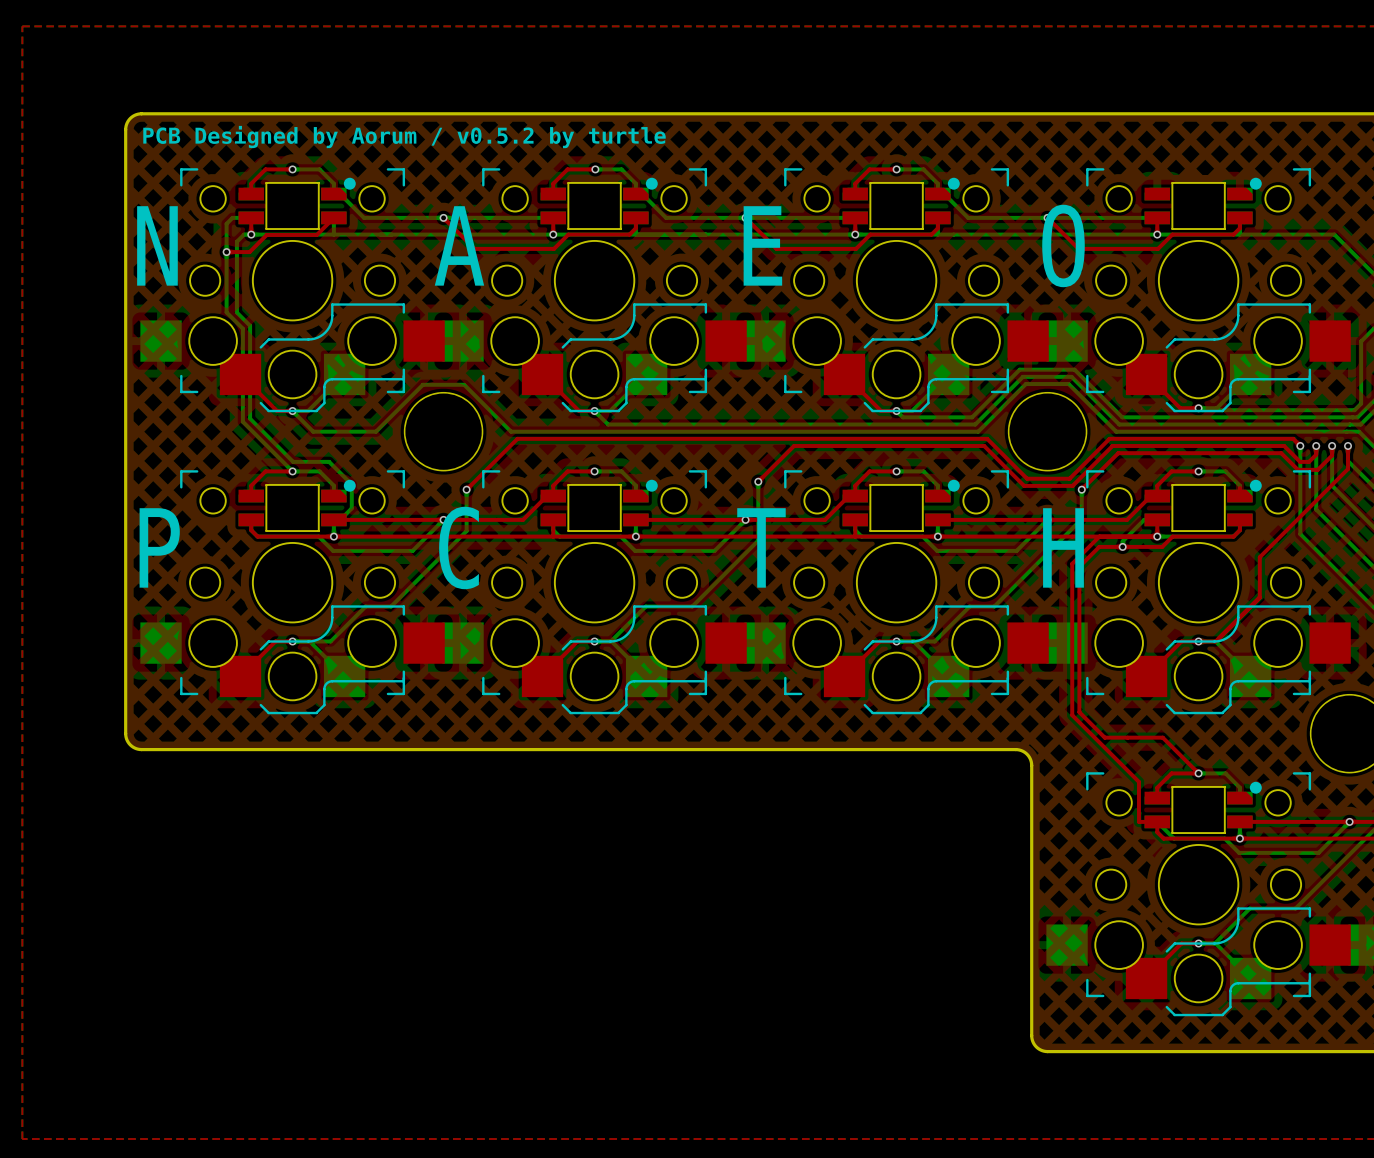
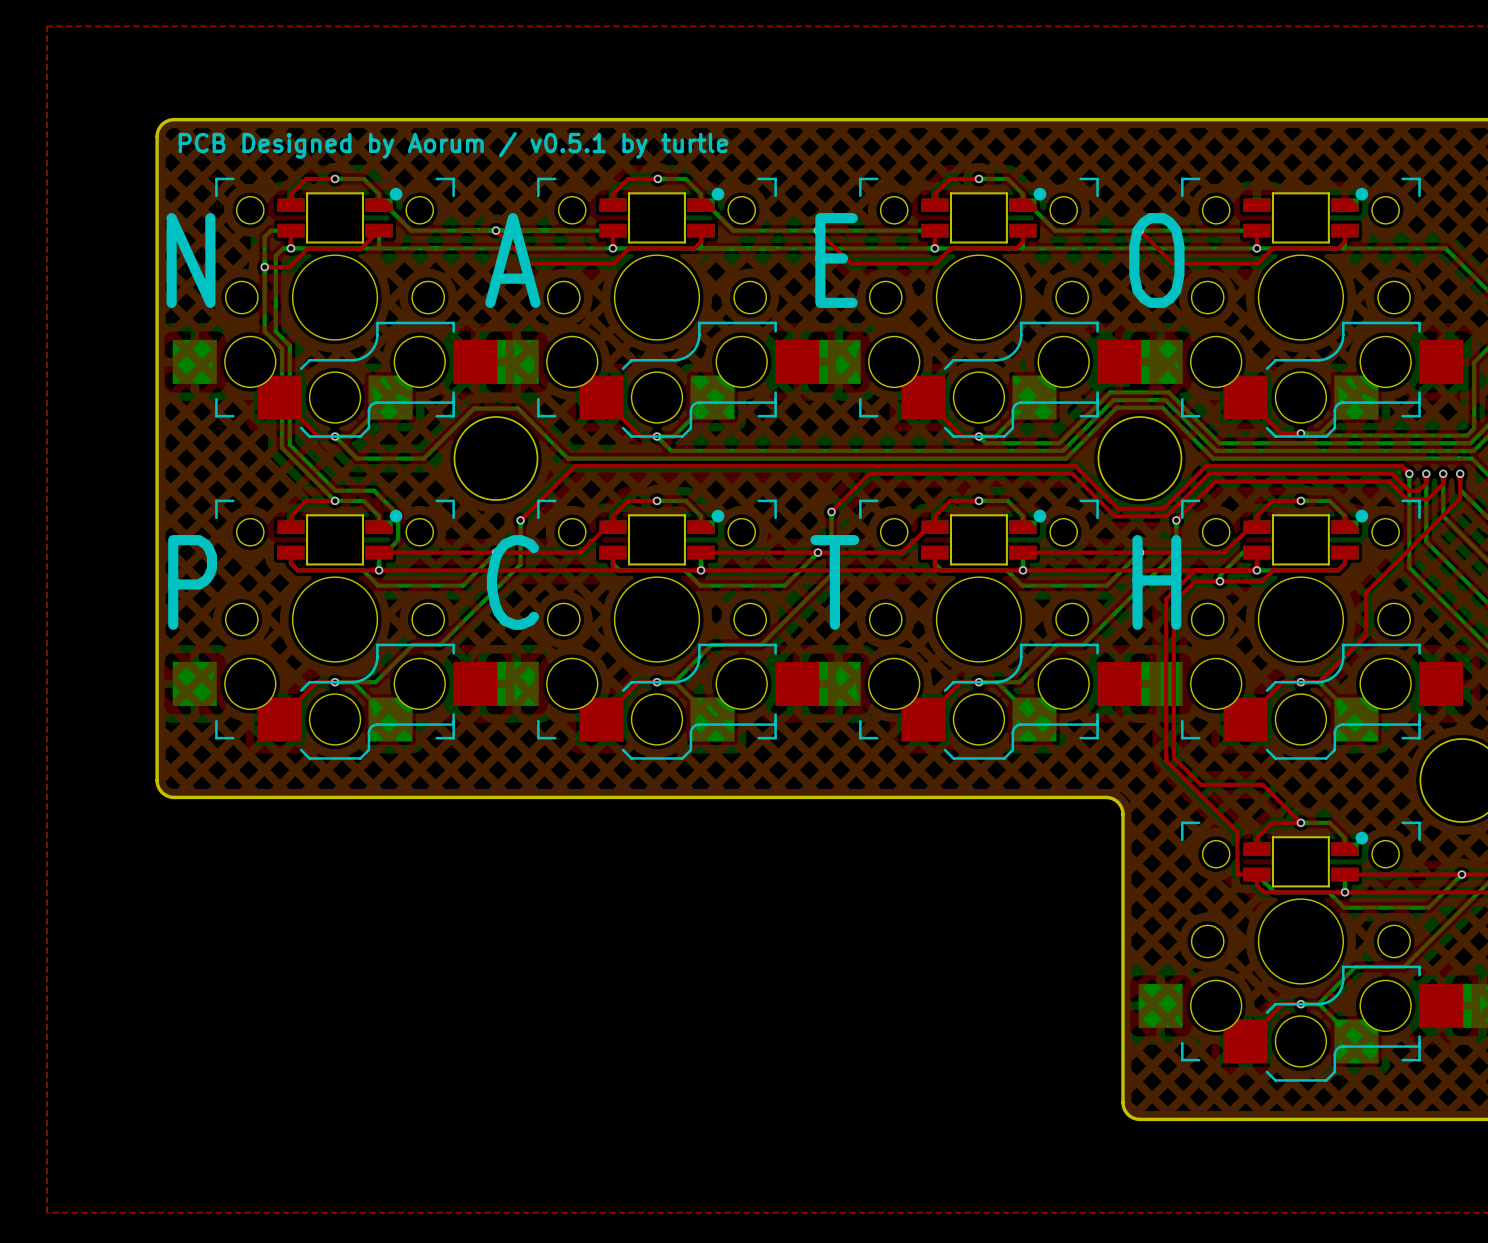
text: PCB Designed by Aorum / v0.5.2 by turtle (404, 137) -> PCB Designed by Aorum / v0.5.1 by turtle (453, 145)

